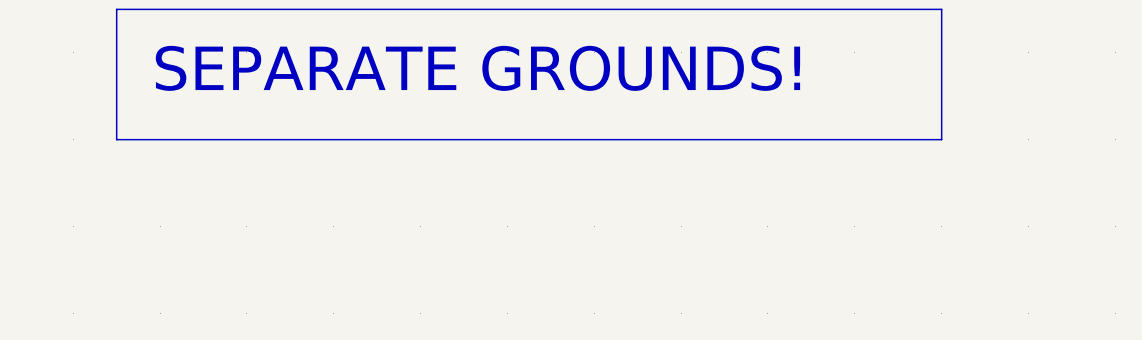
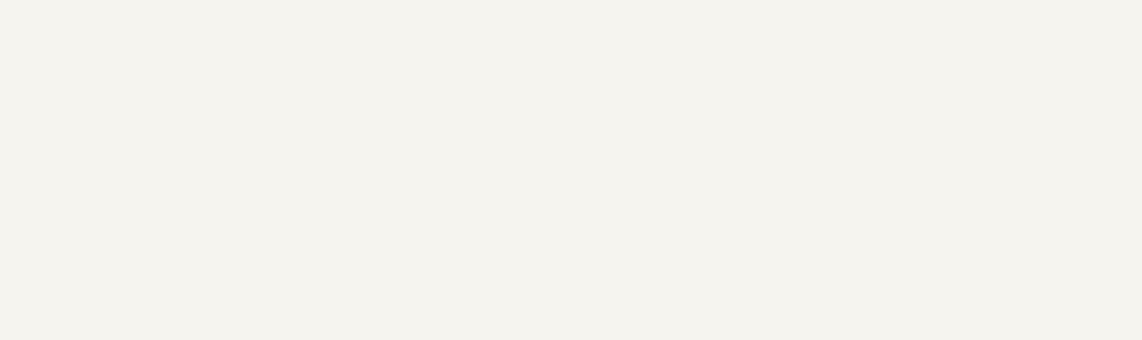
line: (116, 9) (941, 9) (941, 139) (116, 139) (116, 9) -> none
text: SEPARATE GROUNDS! (477, 68) -> none

